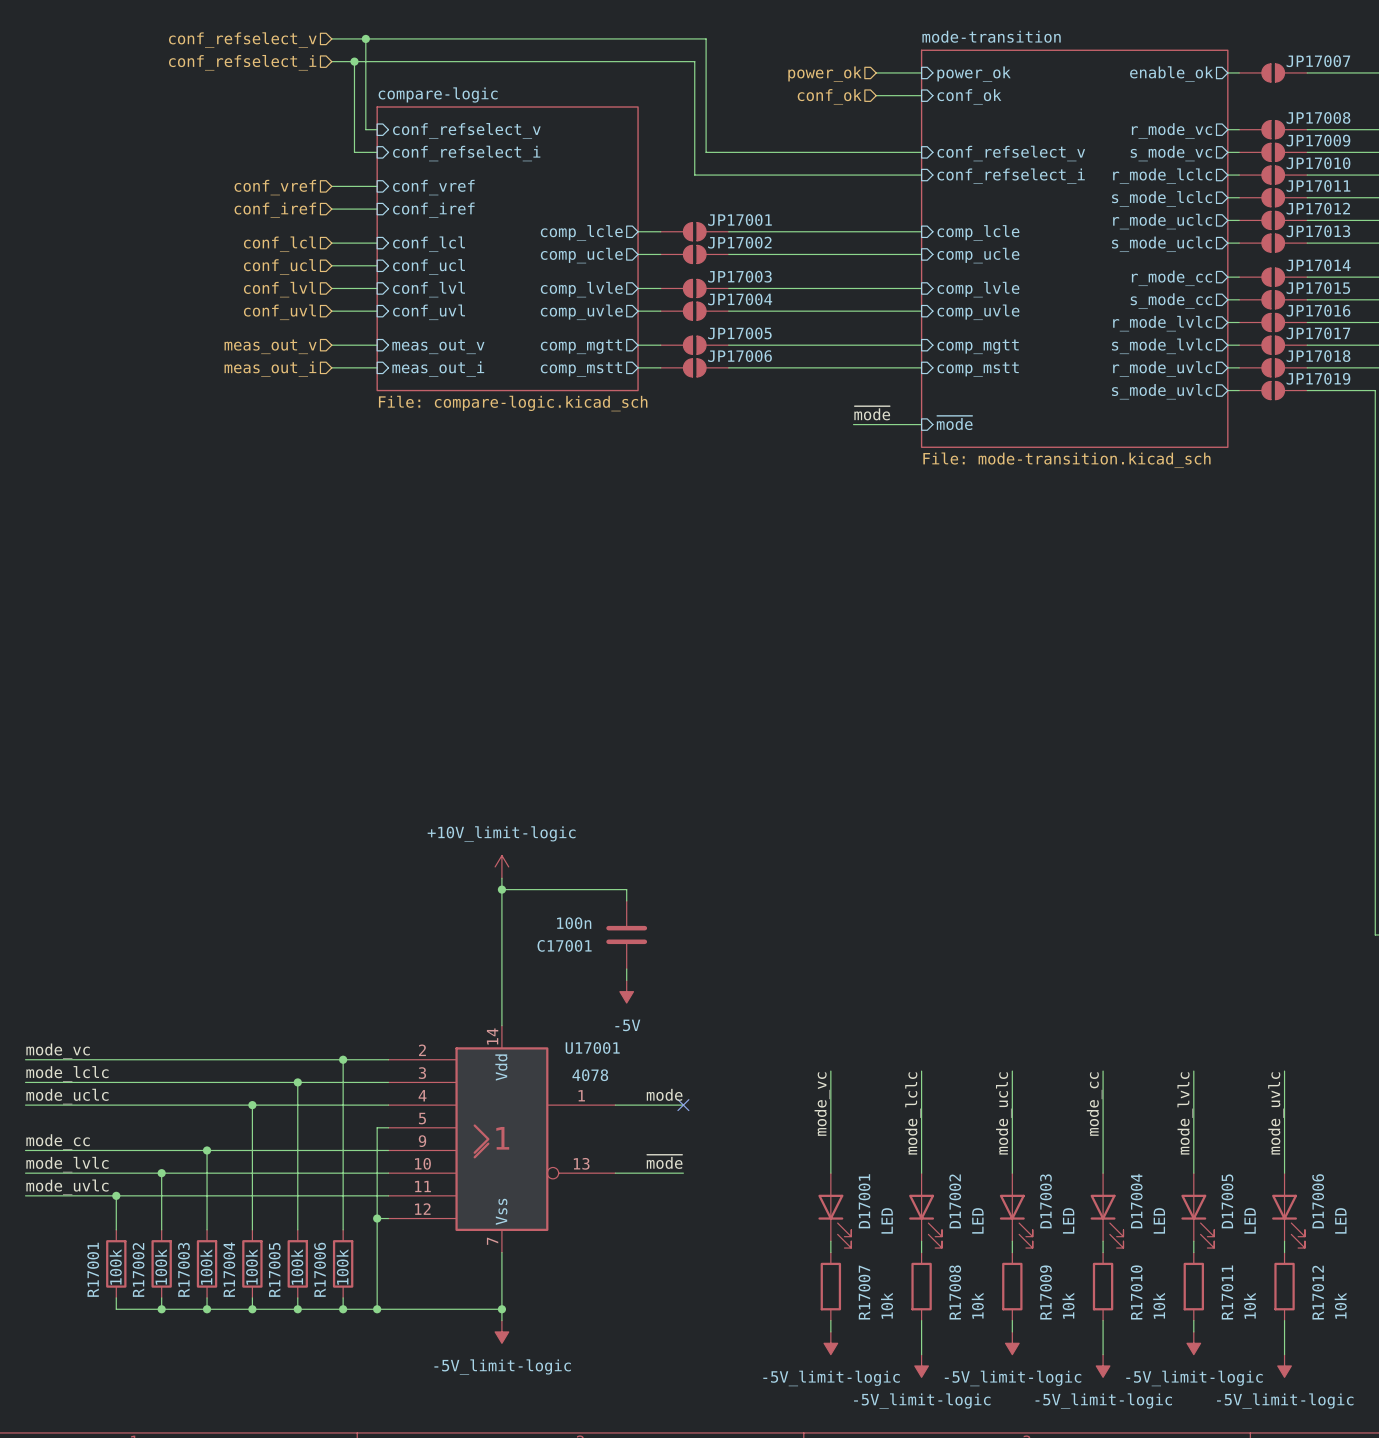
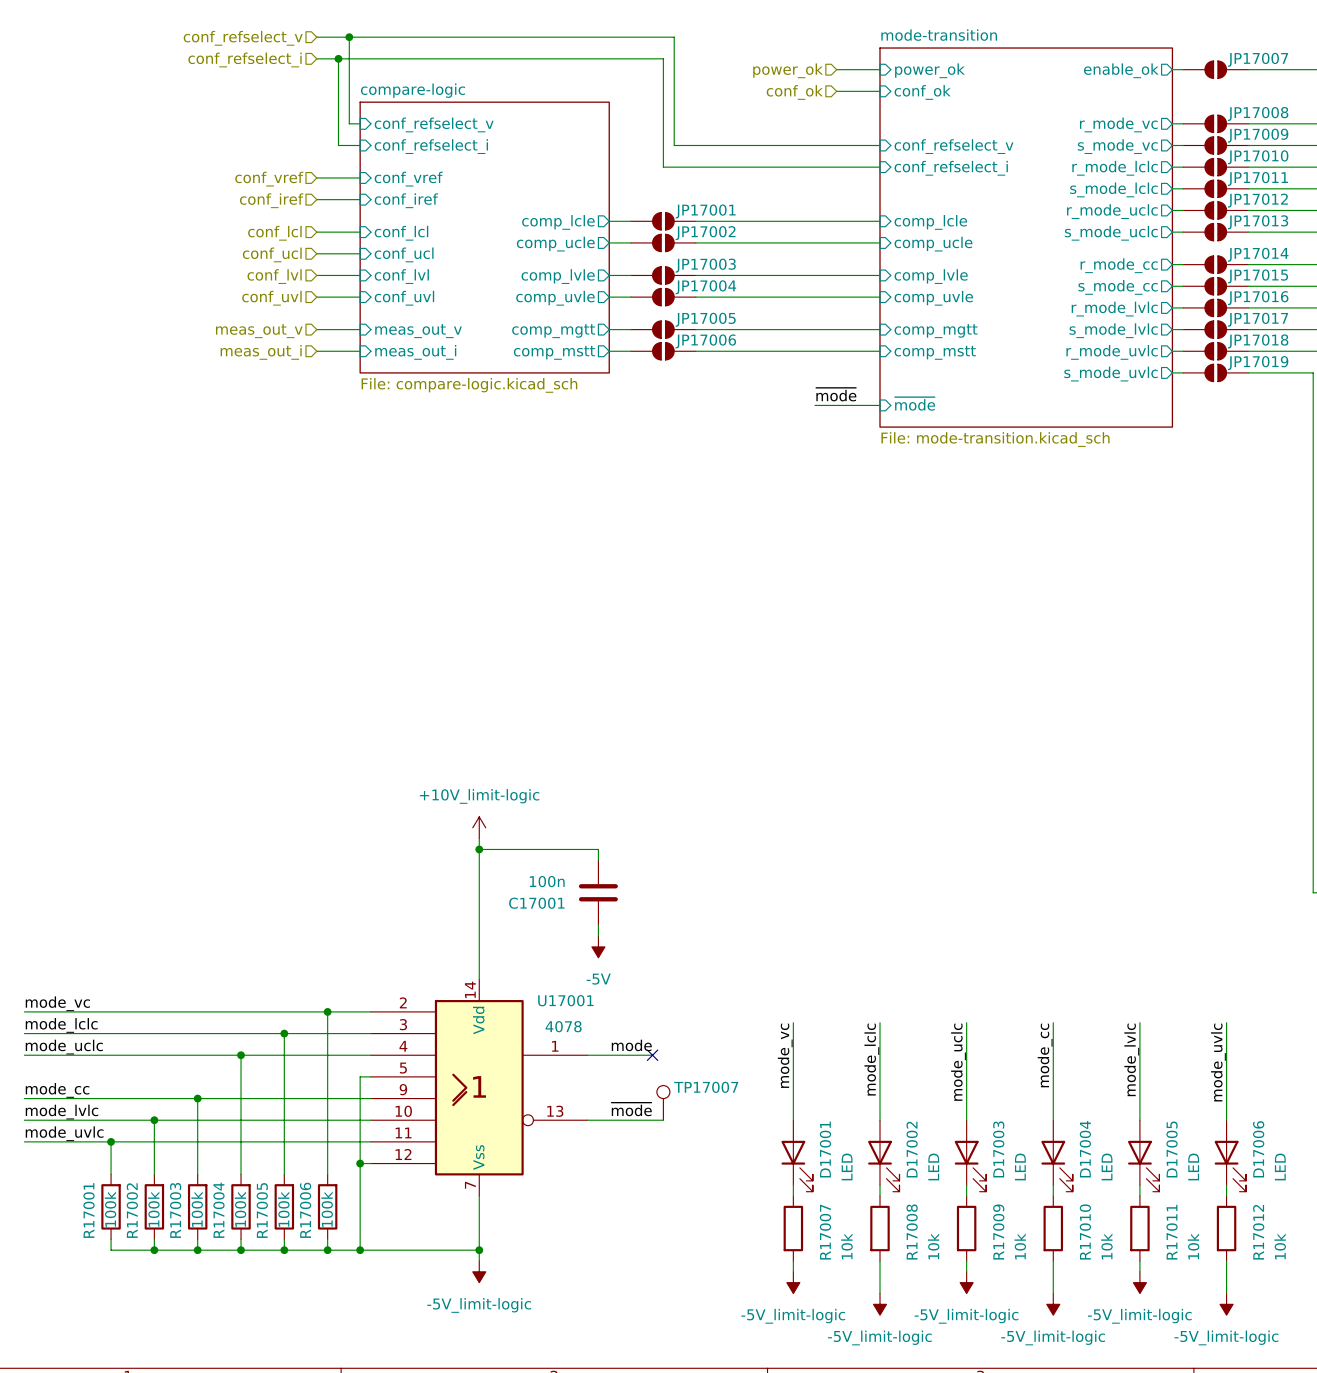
TP17007: none -> (663, 1102)
wire: none -> (652, 1120) (663, 1120)

